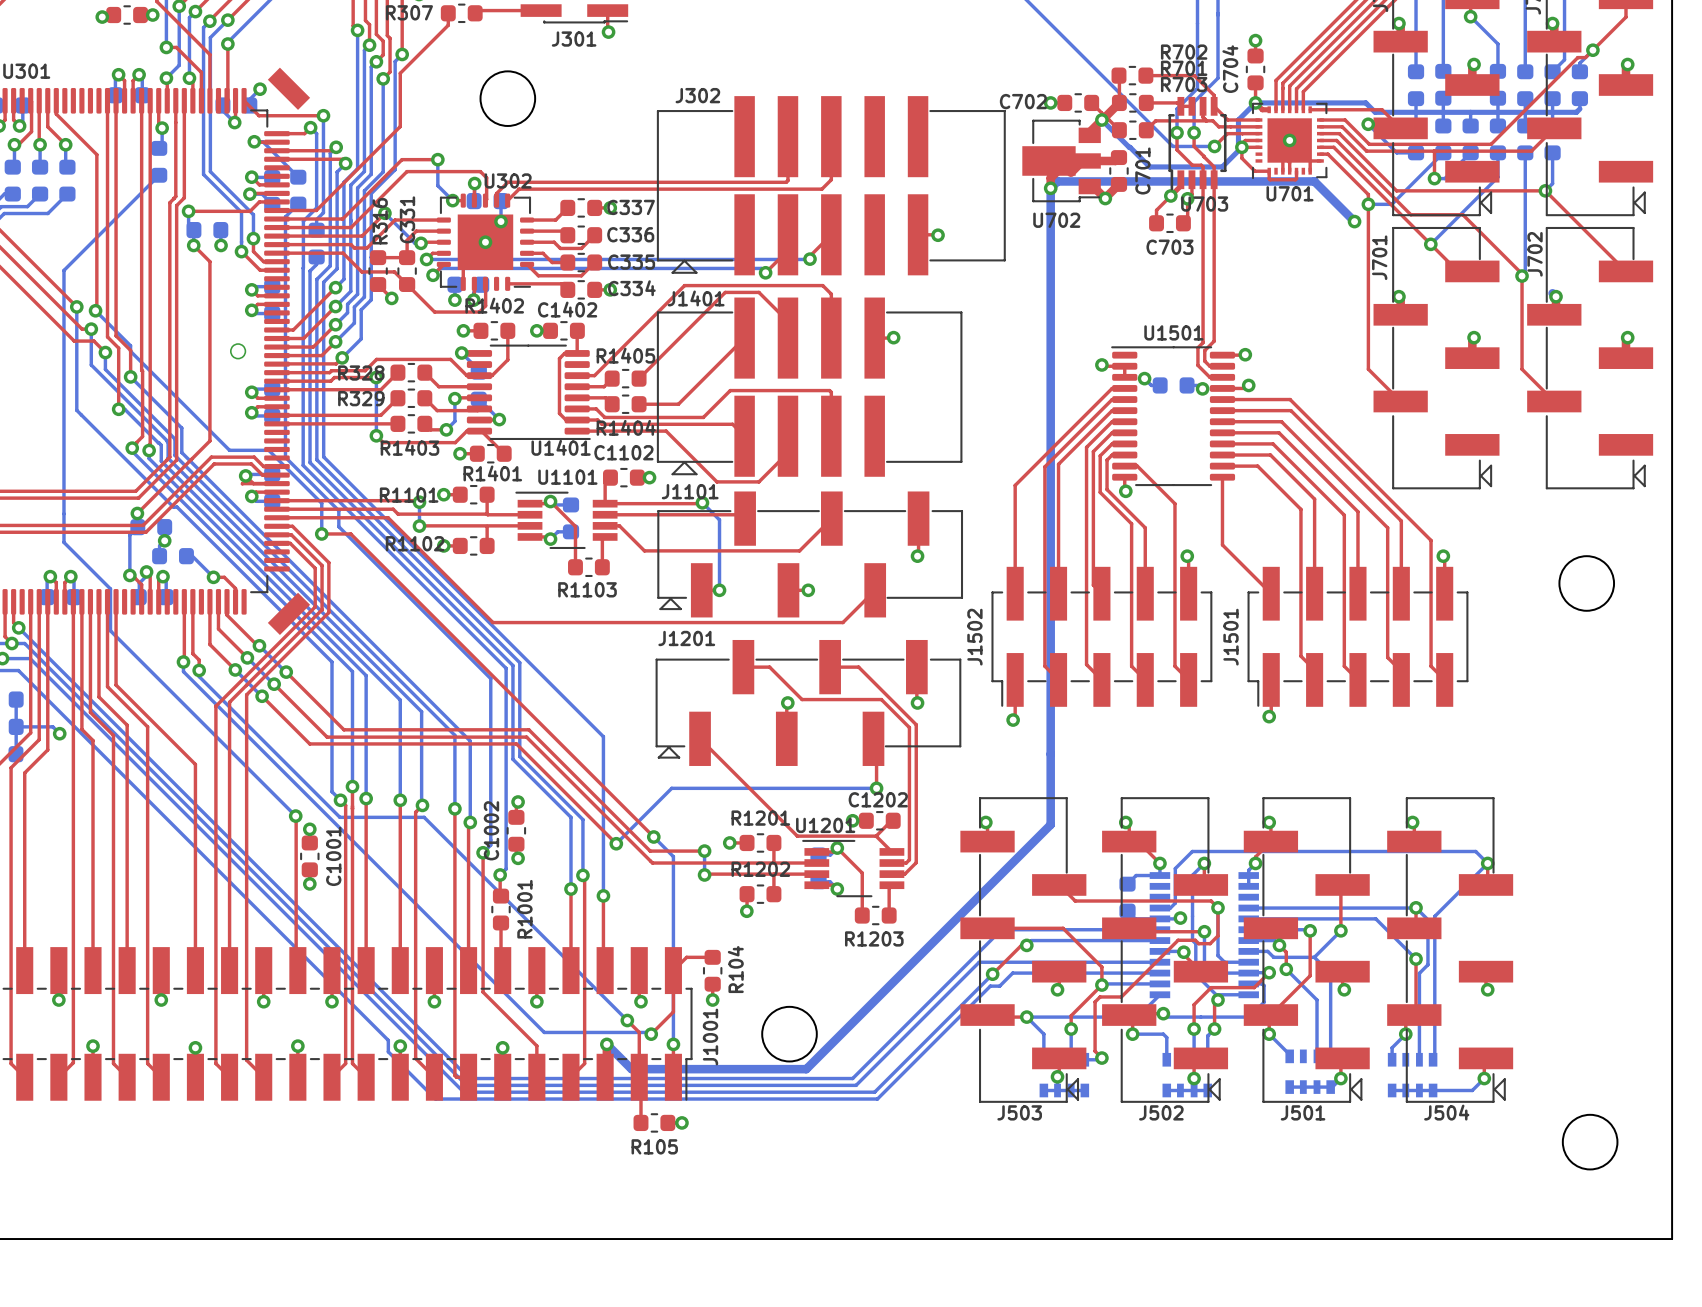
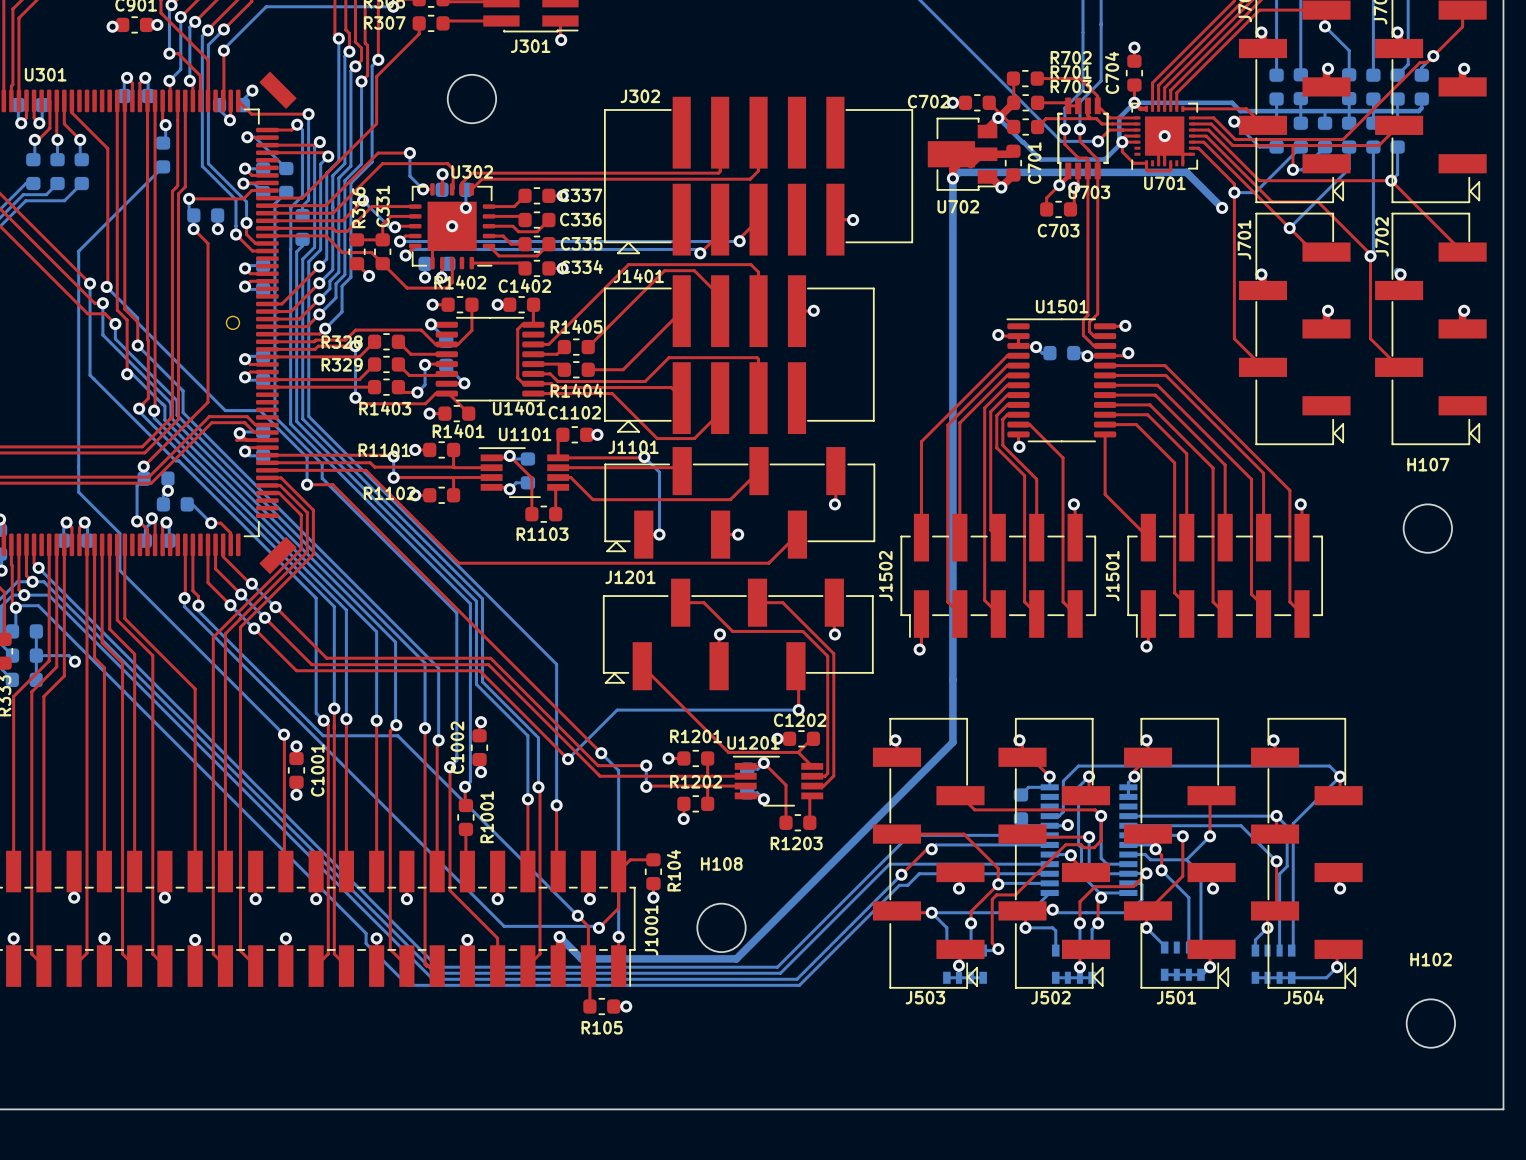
H107 name: none -> H107 (1428, 464)
H108 name: none -> H108 (721, 863)
H102 name: none -> H102 (1431, 959)

